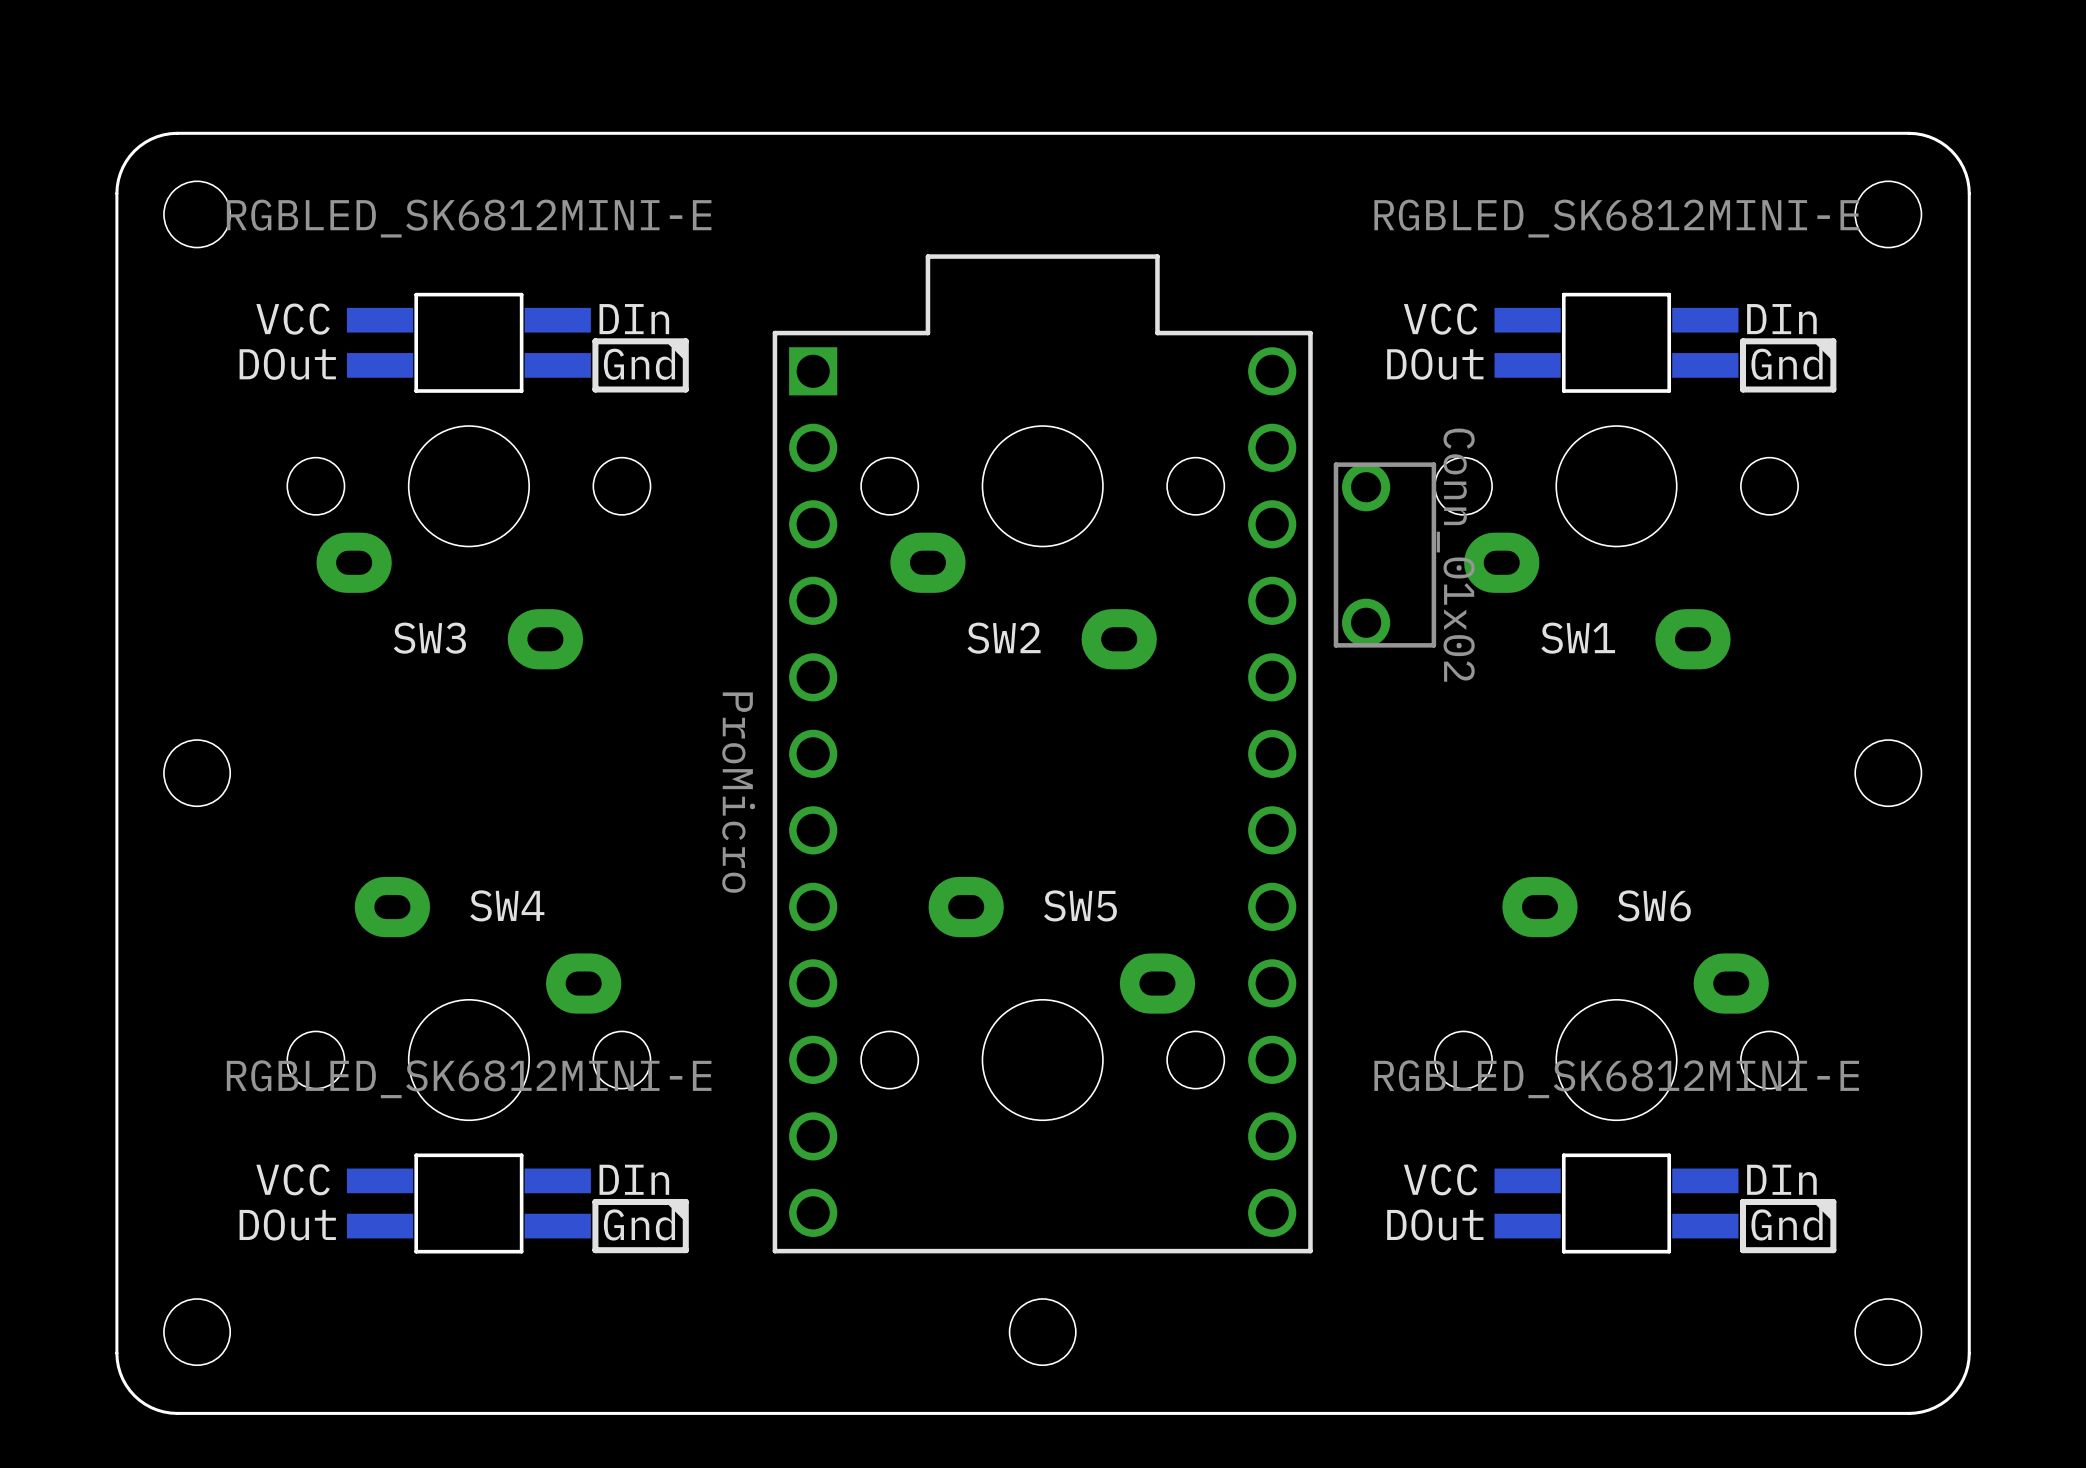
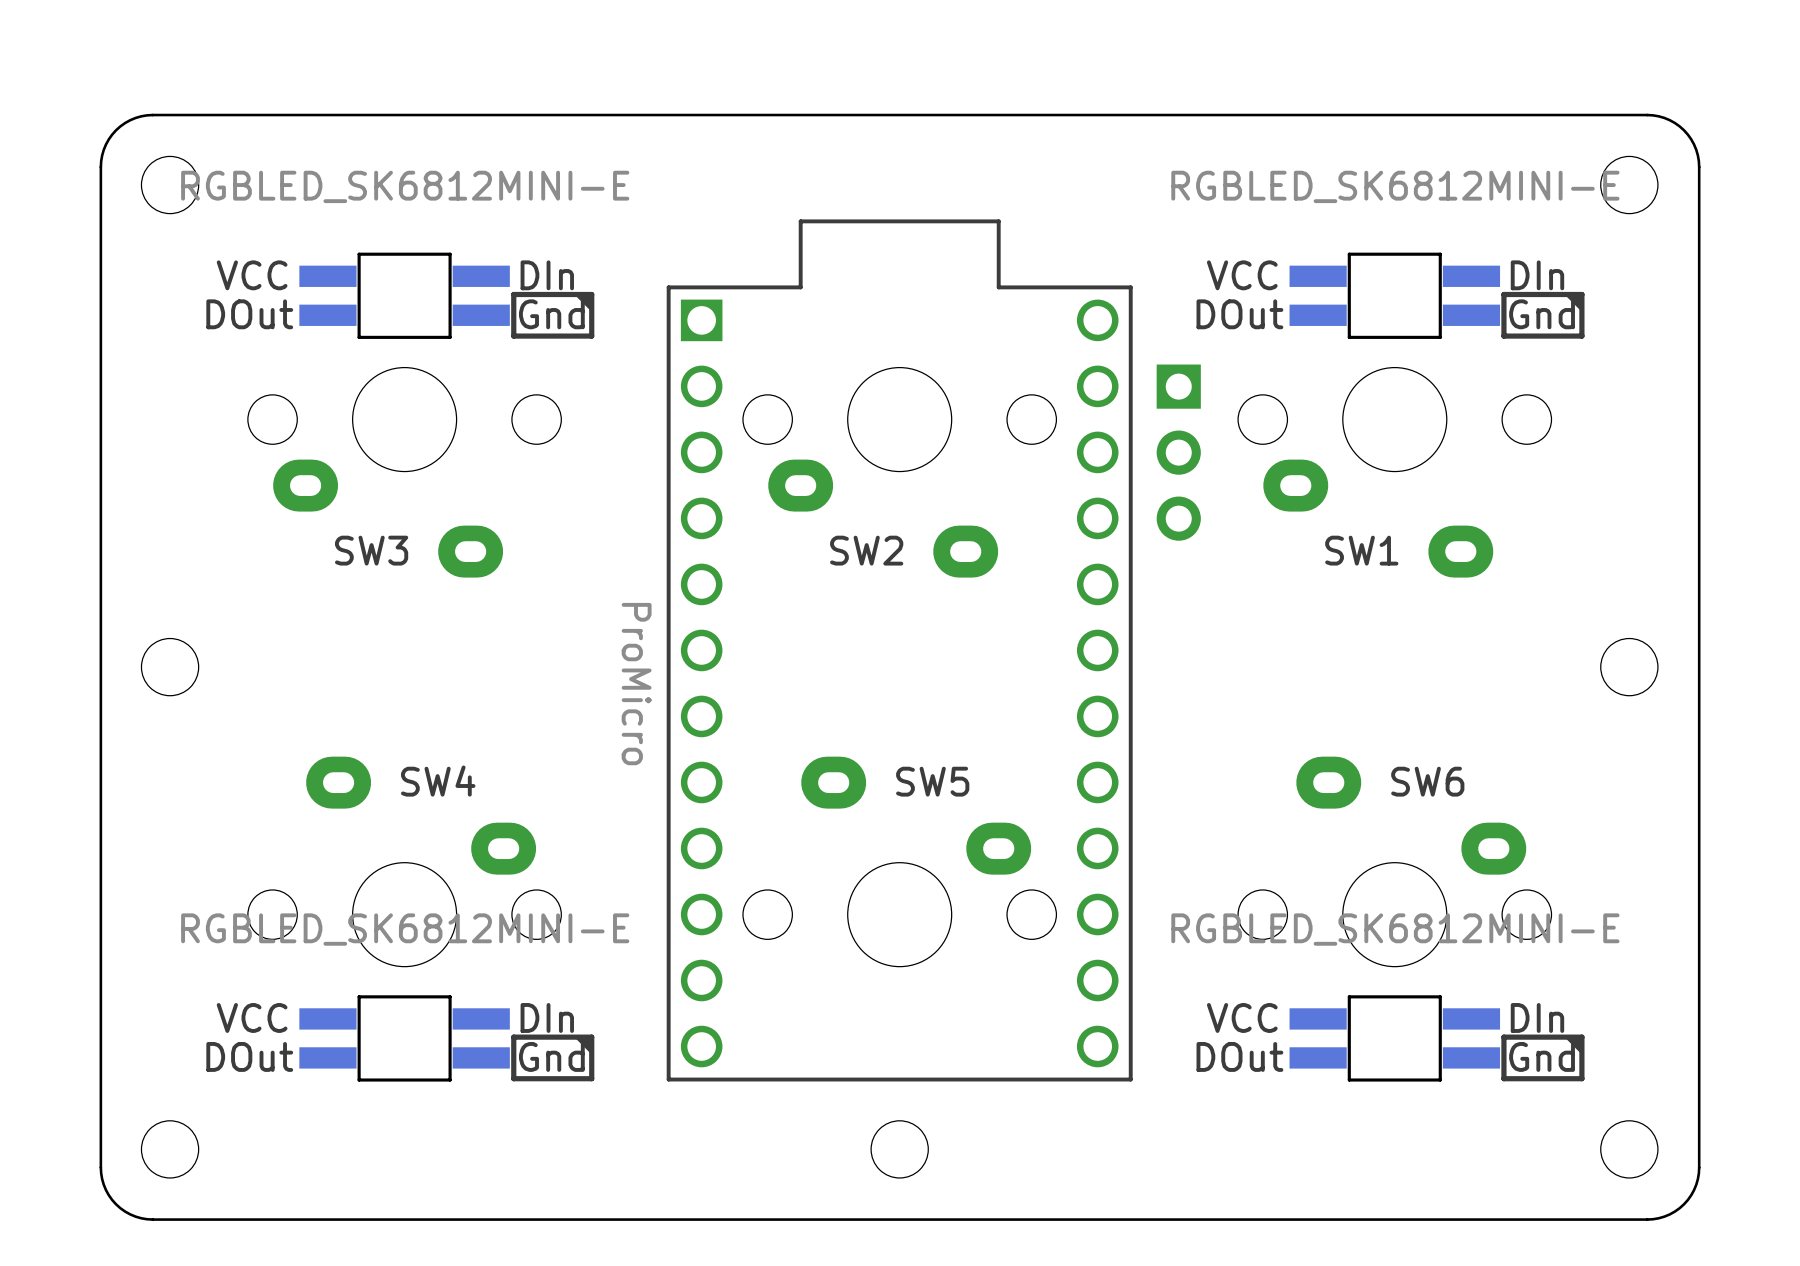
part: none -> (1178, 452)
part: Conn_01x02 (1384, 554) -> none

